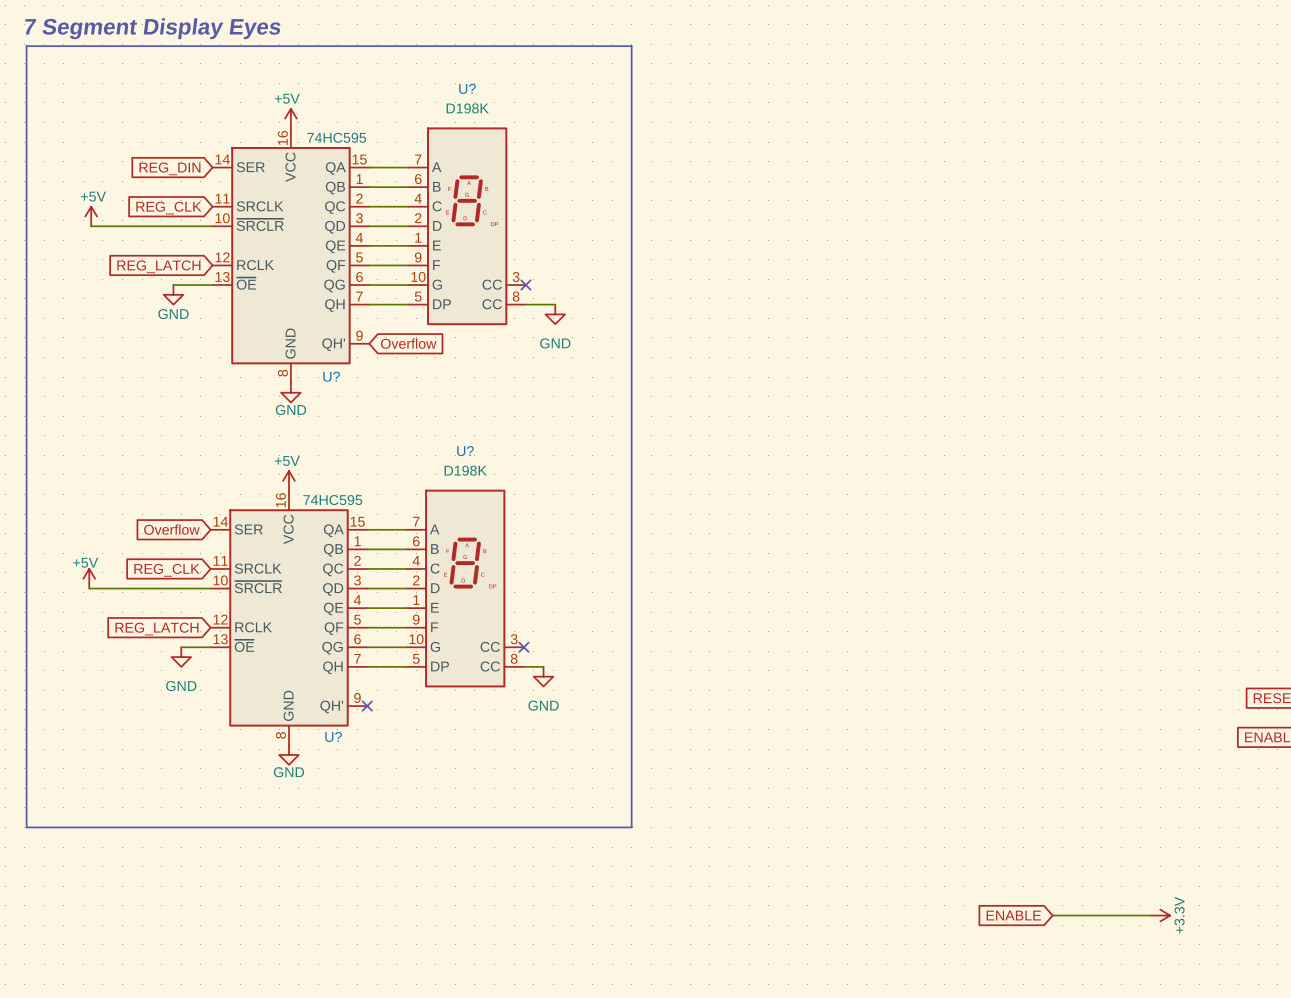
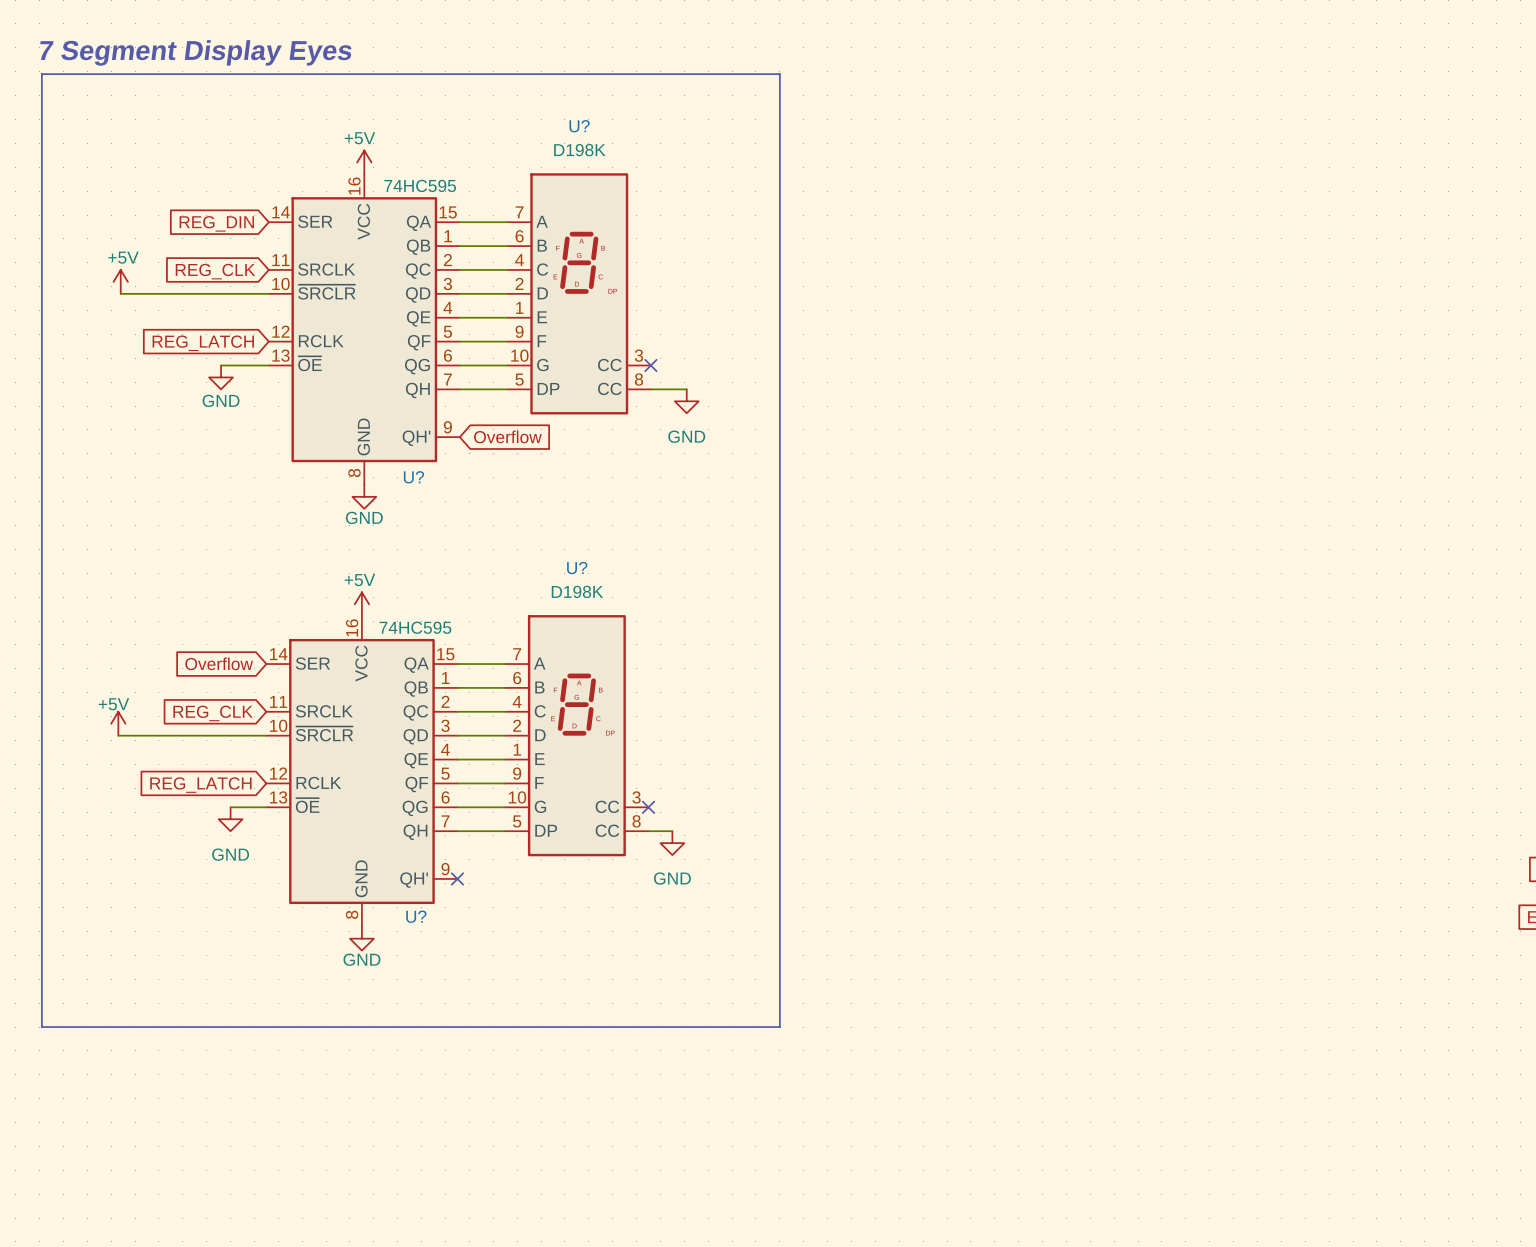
global label: ENABLE (1013, 915) -> none
wire: (1052, 915) (1150, 915) -> none
power symbol: +3.3V (1160, 915) -> none

